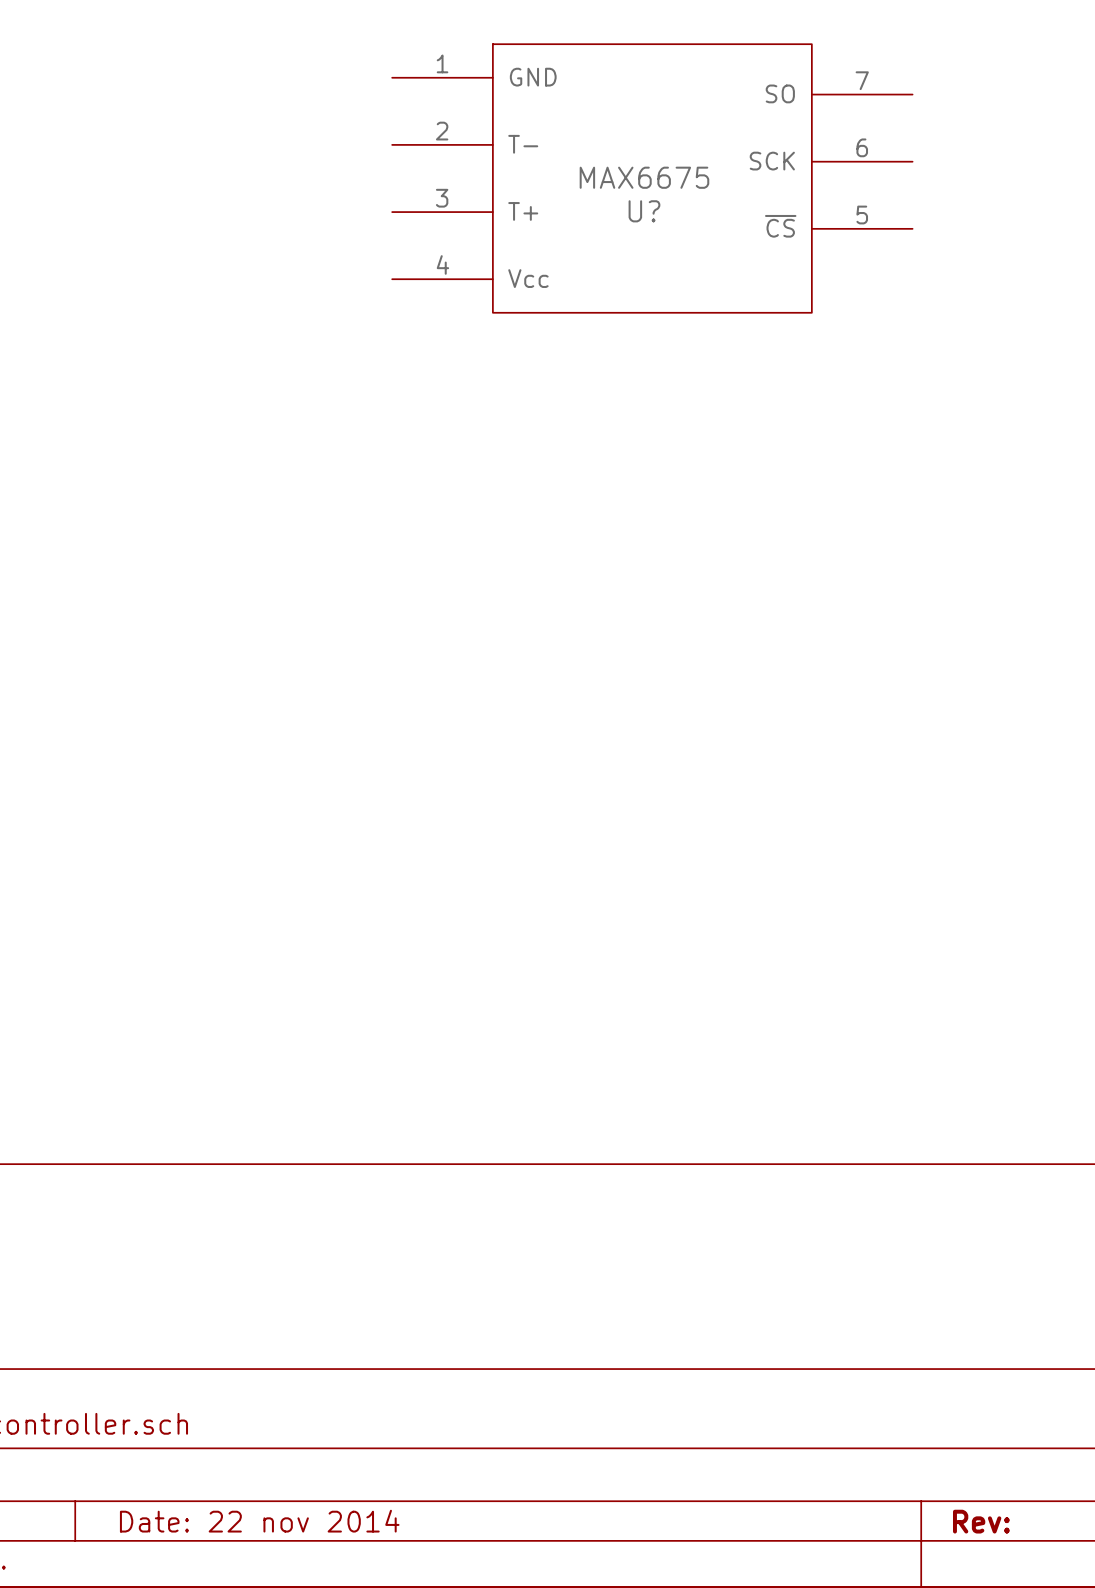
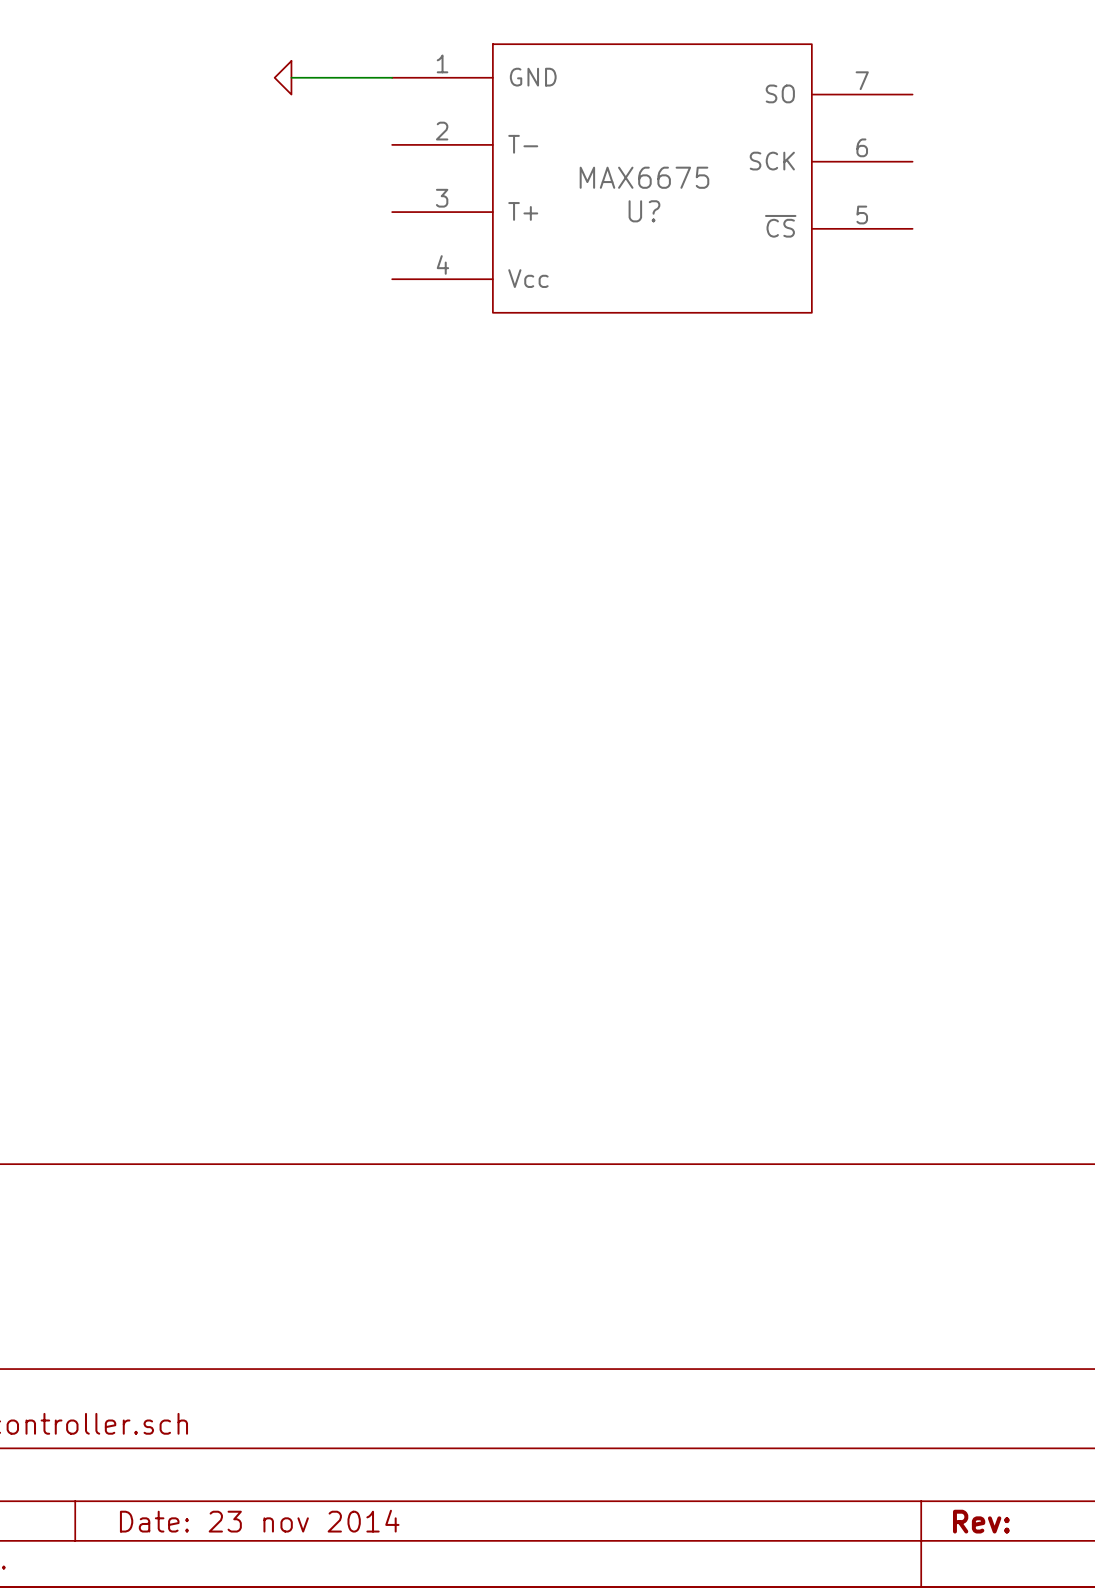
power symbol: none -> (283, 77)
wire: none -> (291, 77) (392, 77)
title block: Date: 22 nov 2014 (259, 1521) -> Date: 23 nov 2014 (259, 1521)

